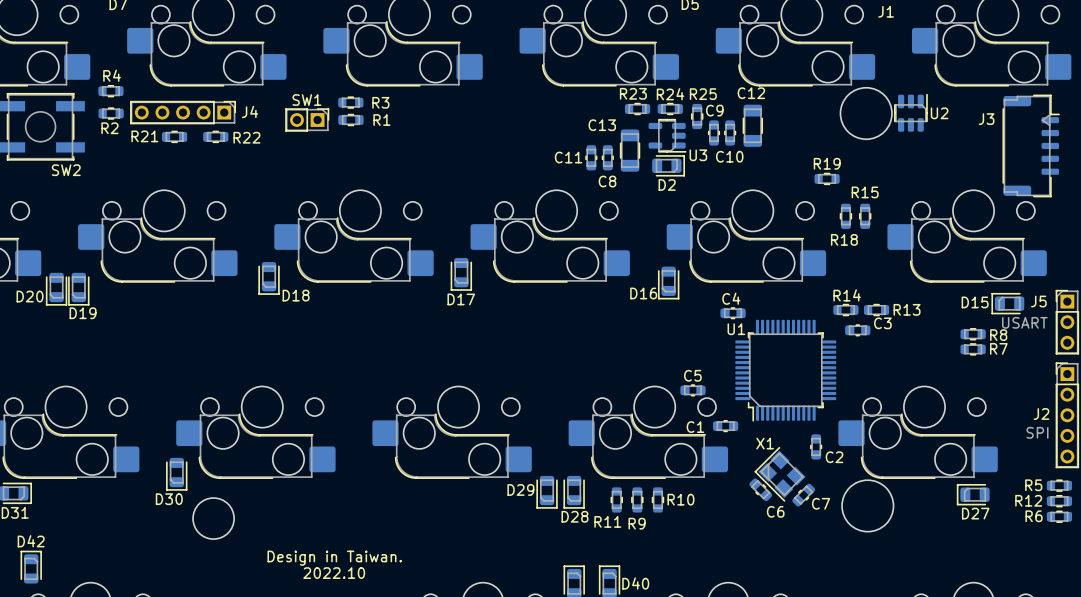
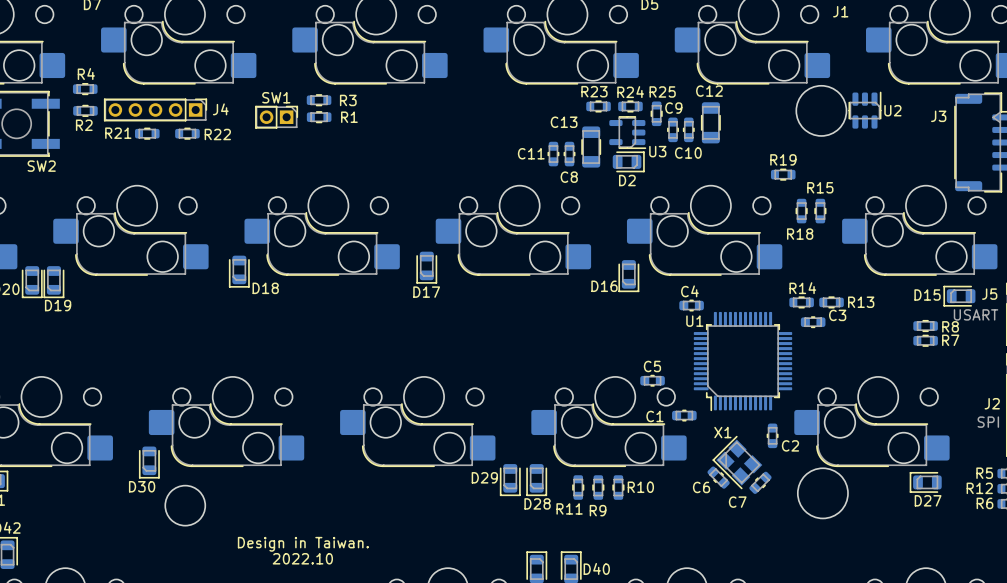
C7 name position: C7 (821, 503) -> C7 (737, 502)
C6 name position: C6 (775, 511) -> C6 (701, 487)

